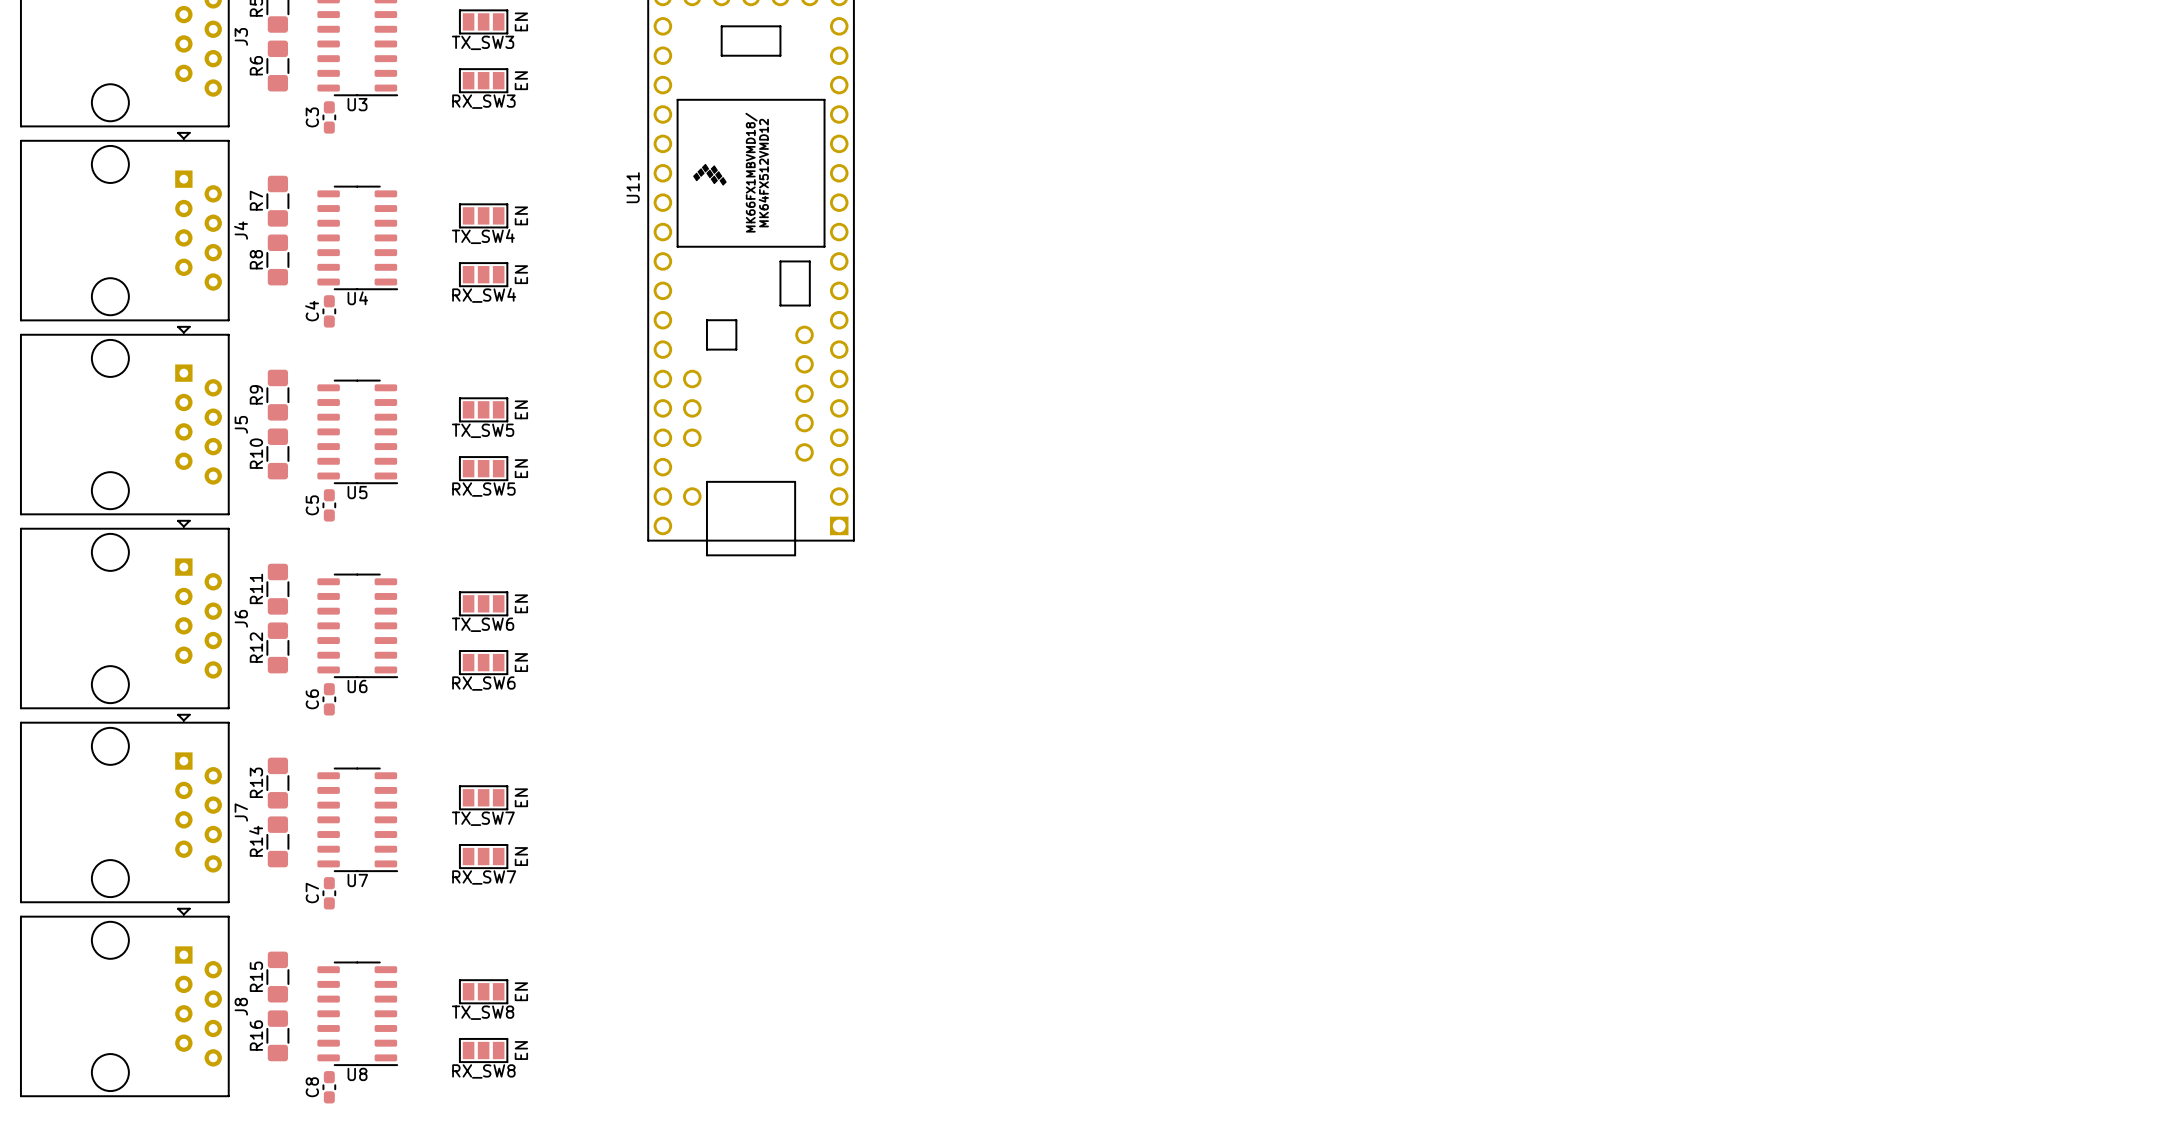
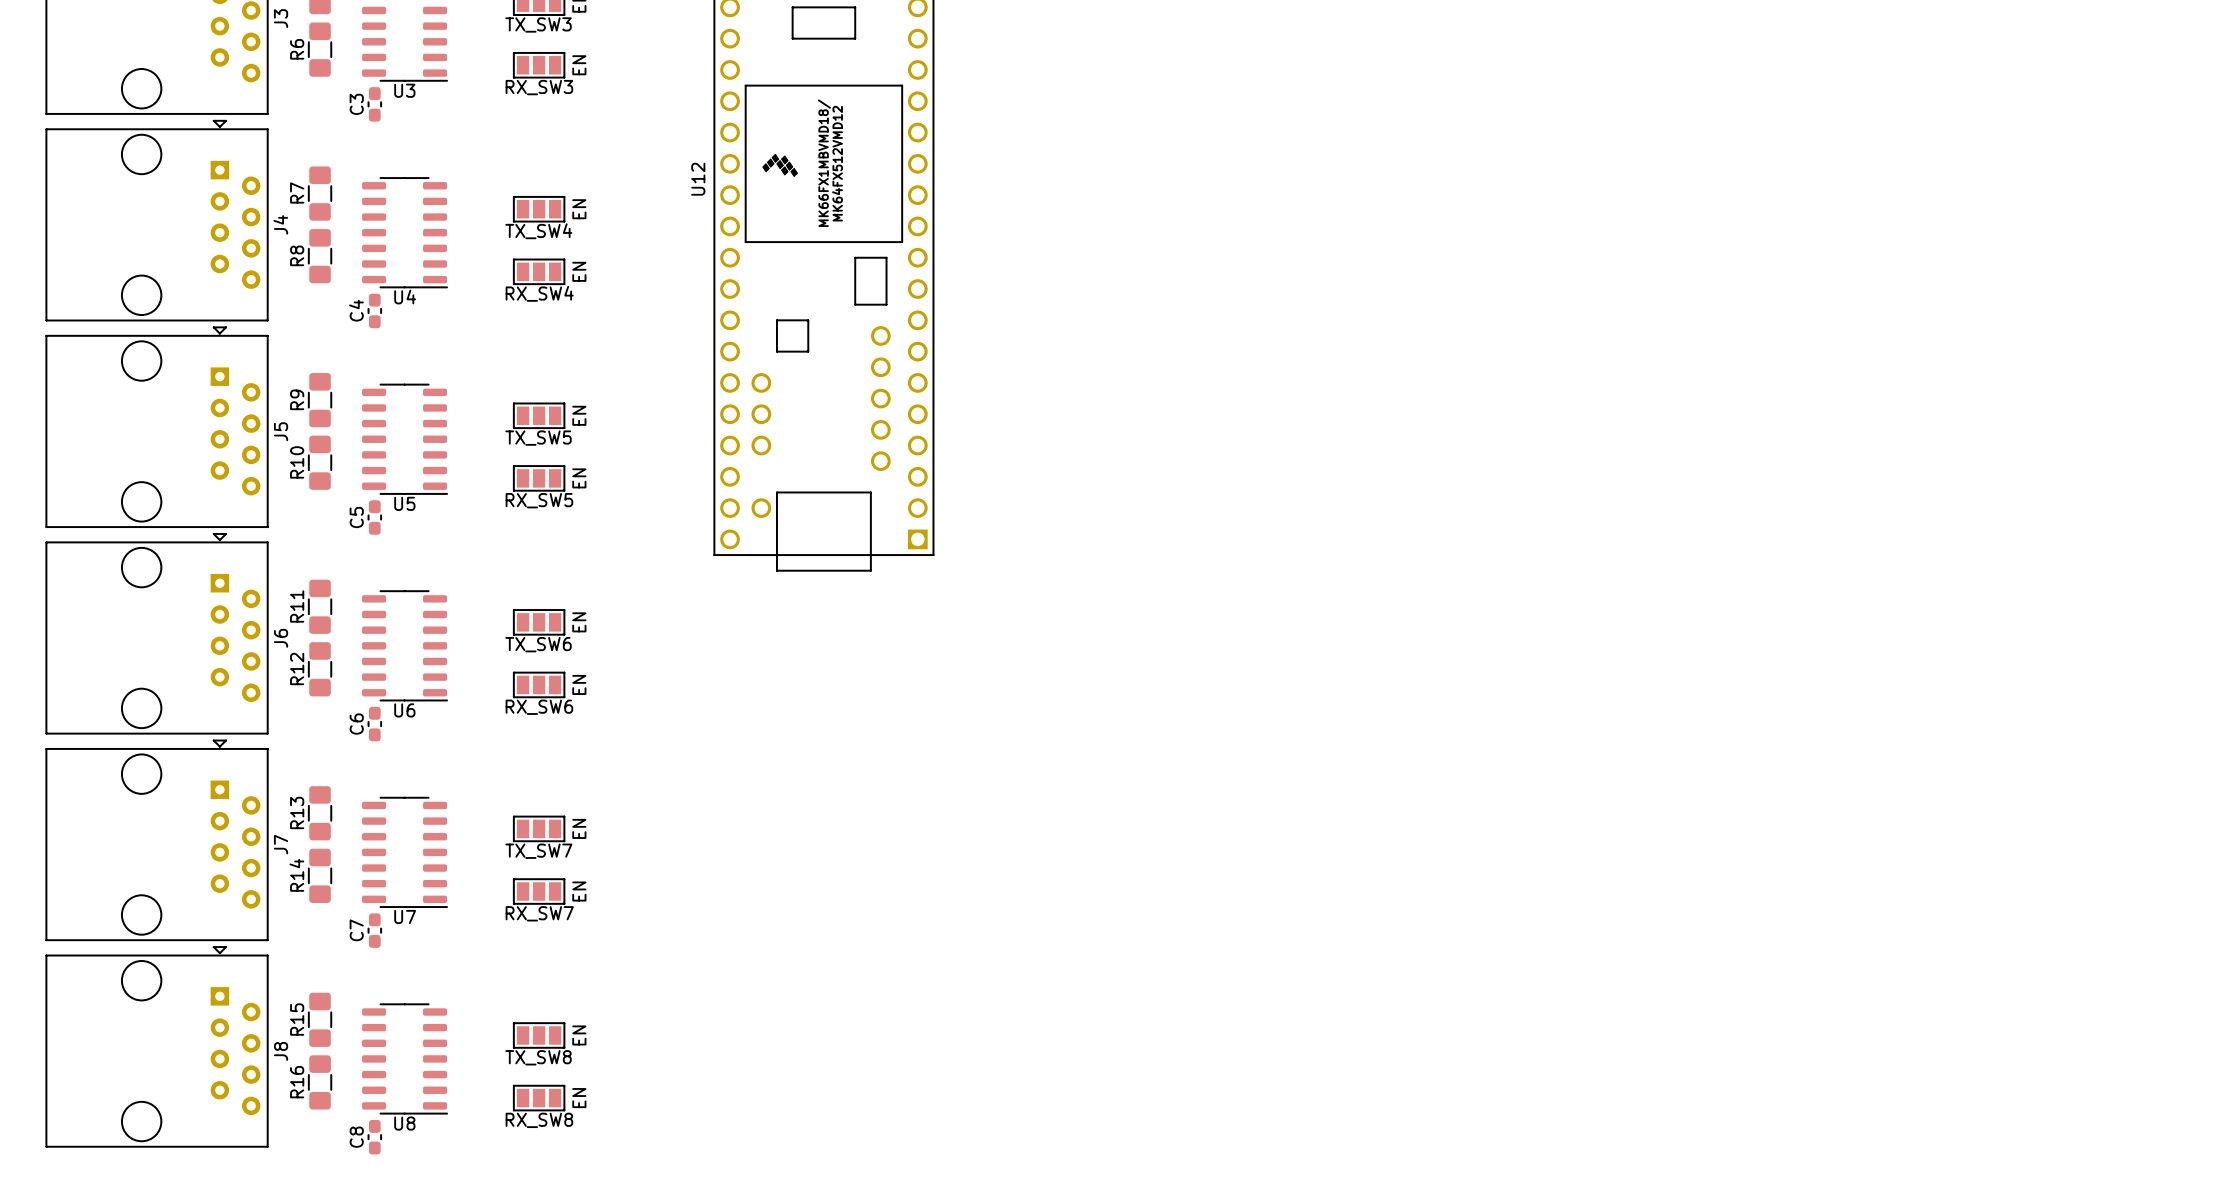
U11 name: U11 (633, 187) -> U12 (698, 179)

